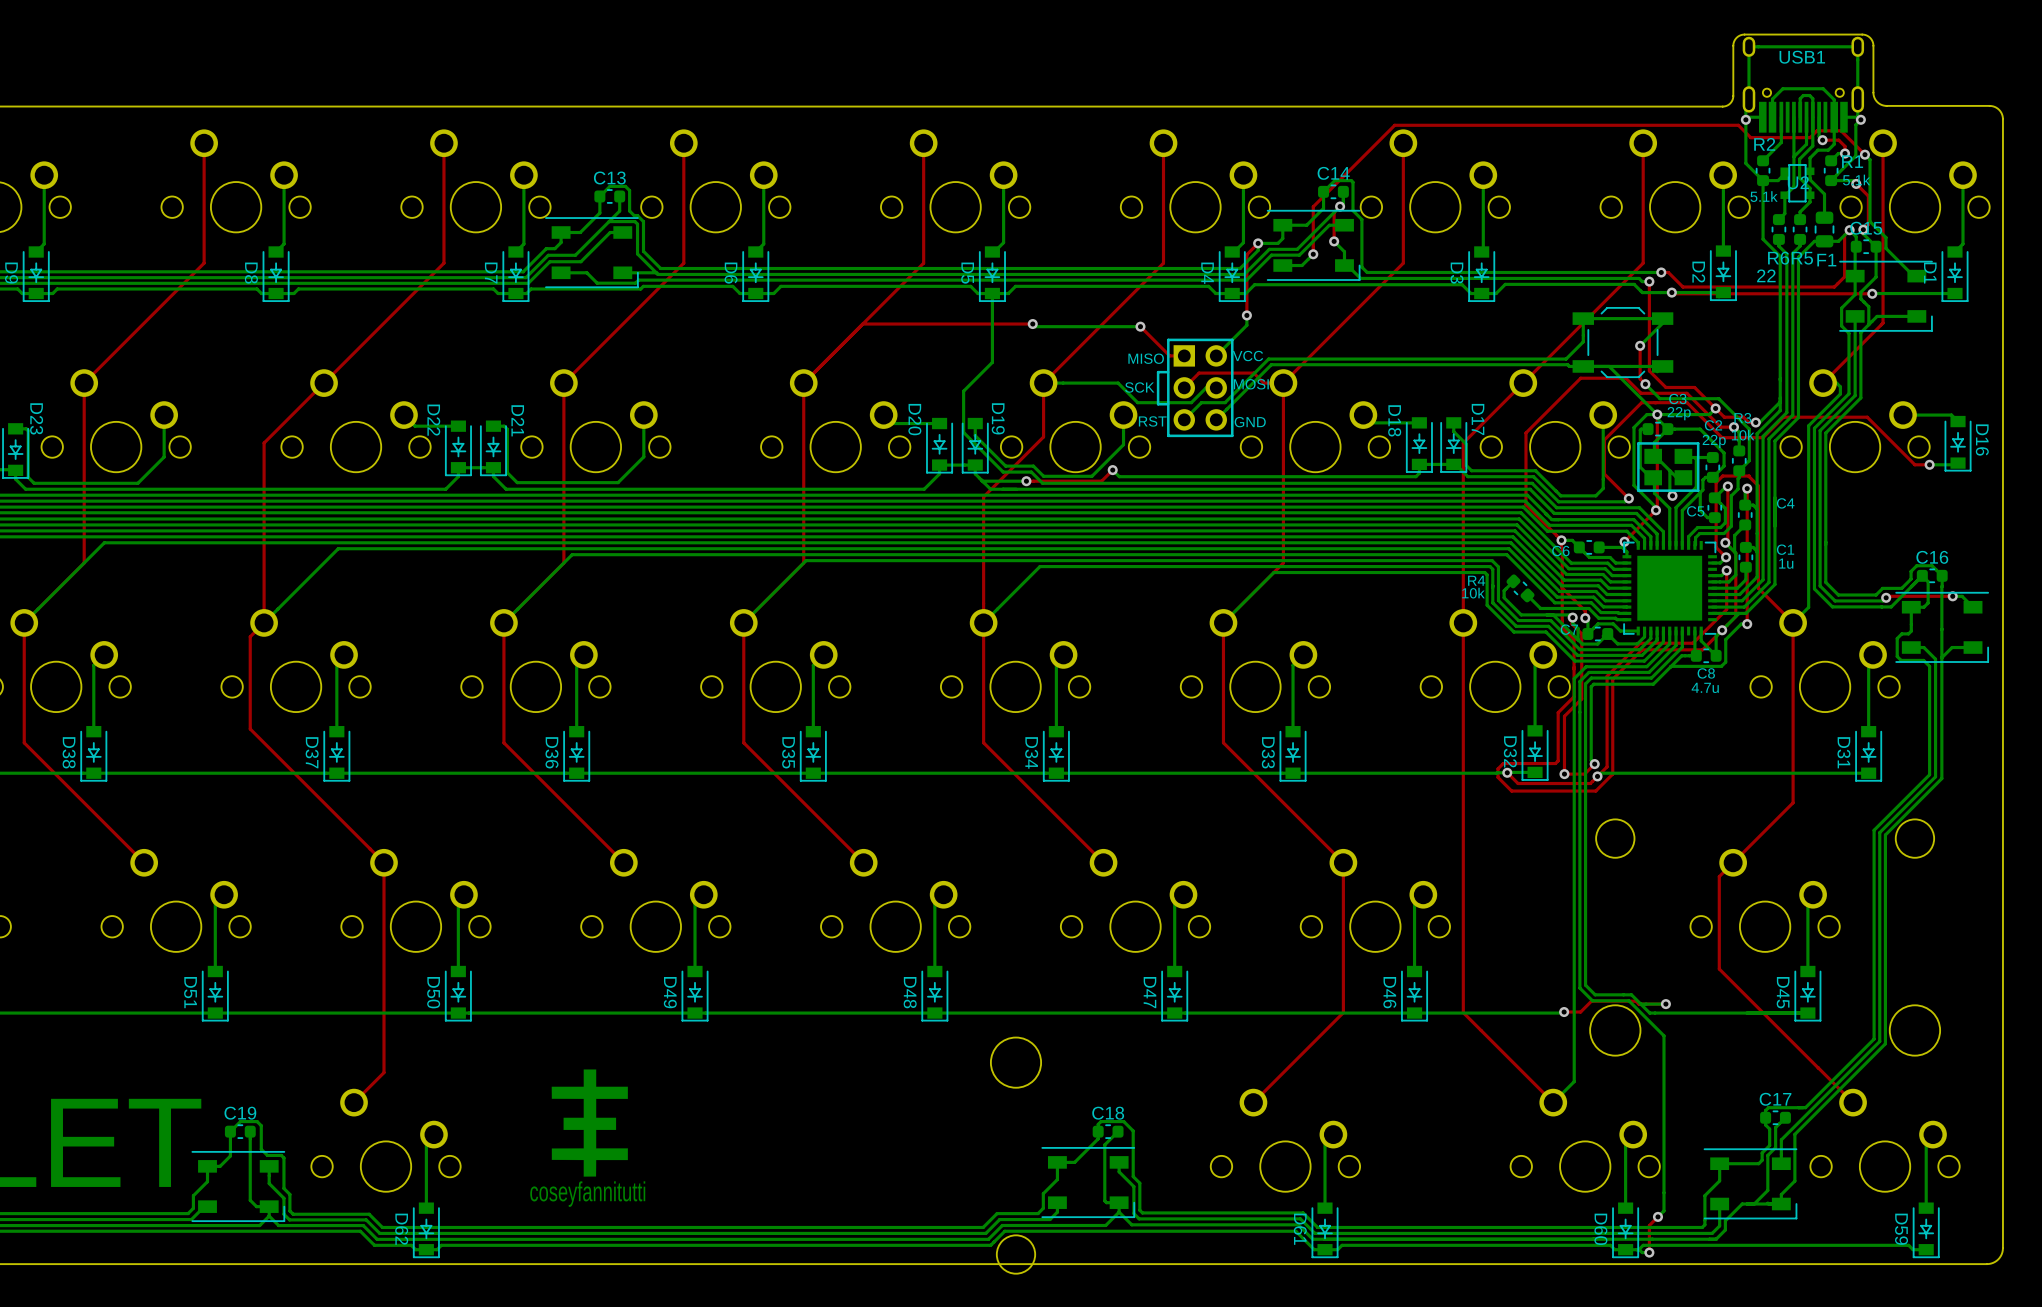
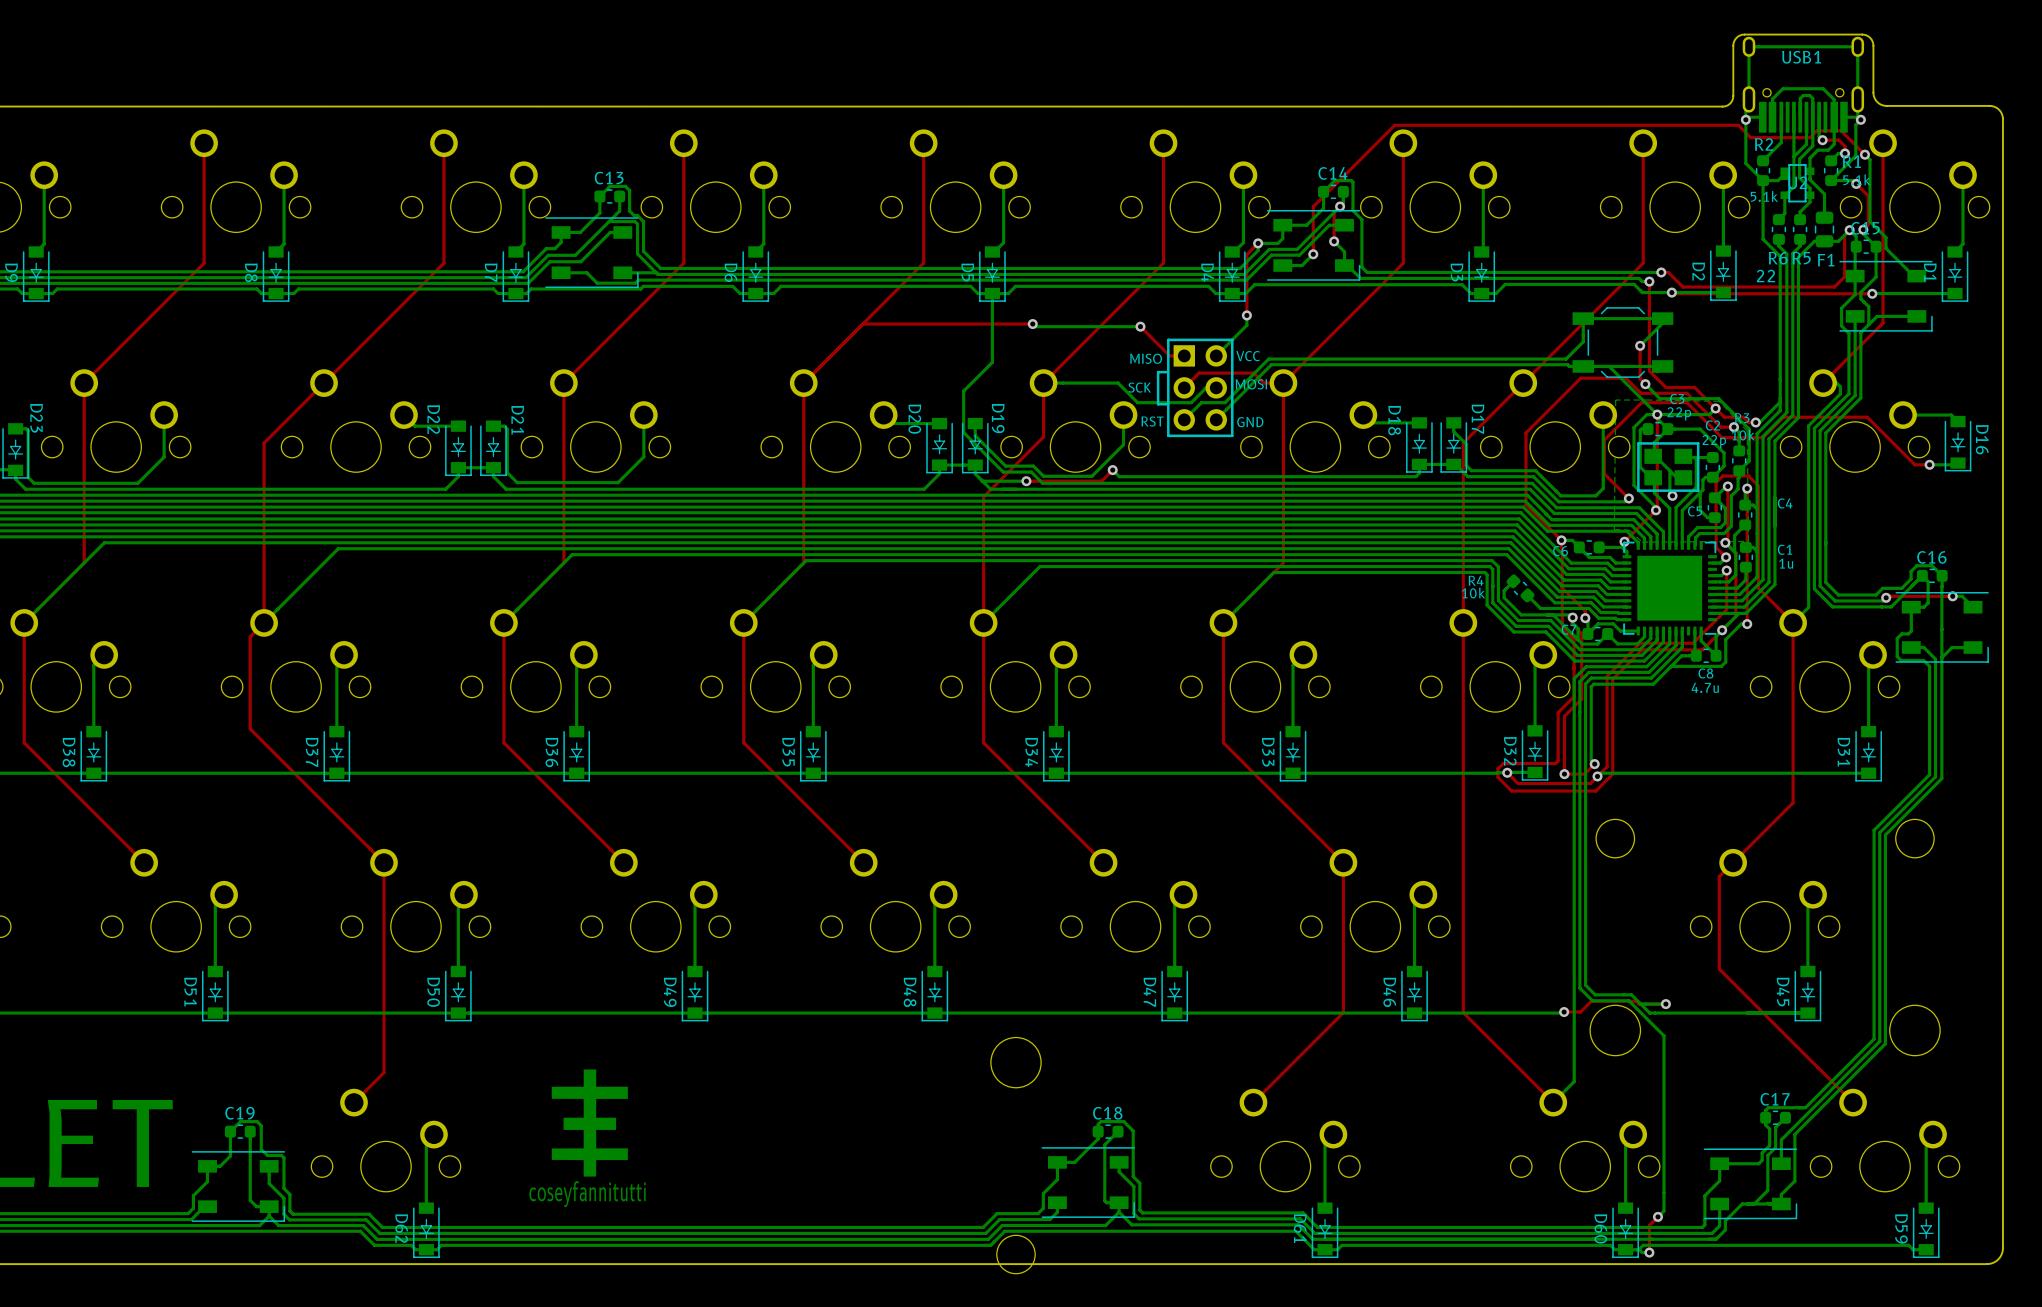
bottom zone outline: none -> (1649, 400) (1719, 401) (1747, 431) (1748, 541) (1642, 542) (1629, 530) (1614, 529) (1615, 400) (1649, 400)

